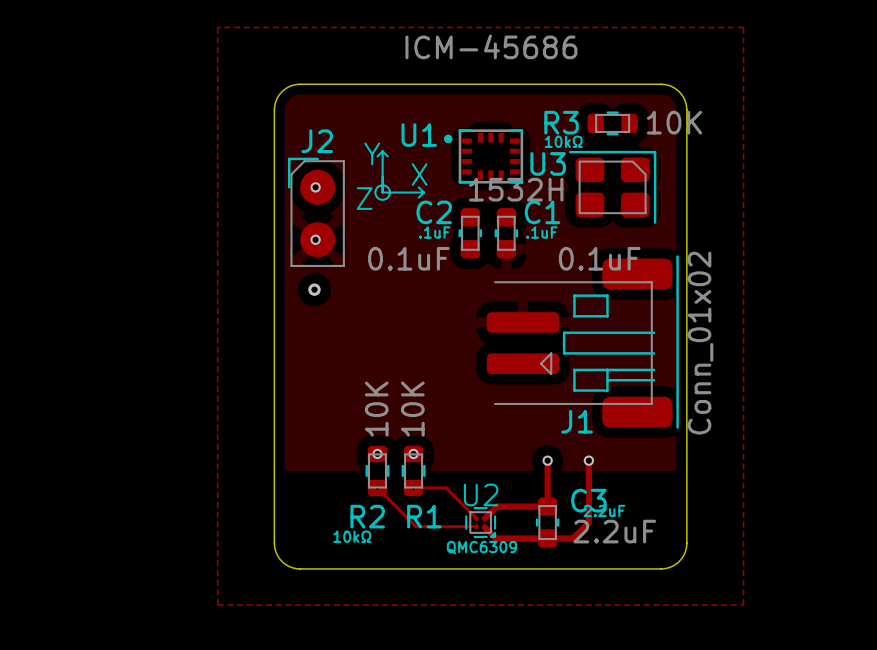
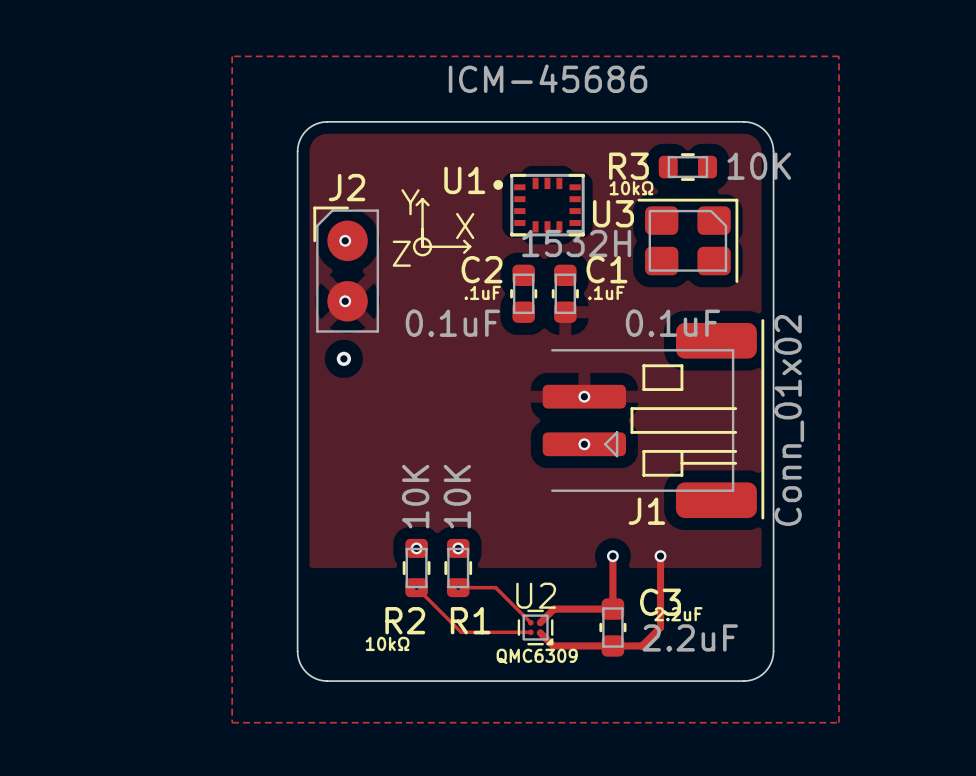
via: none -> (584, 396)
via: none -> (584, 444)

